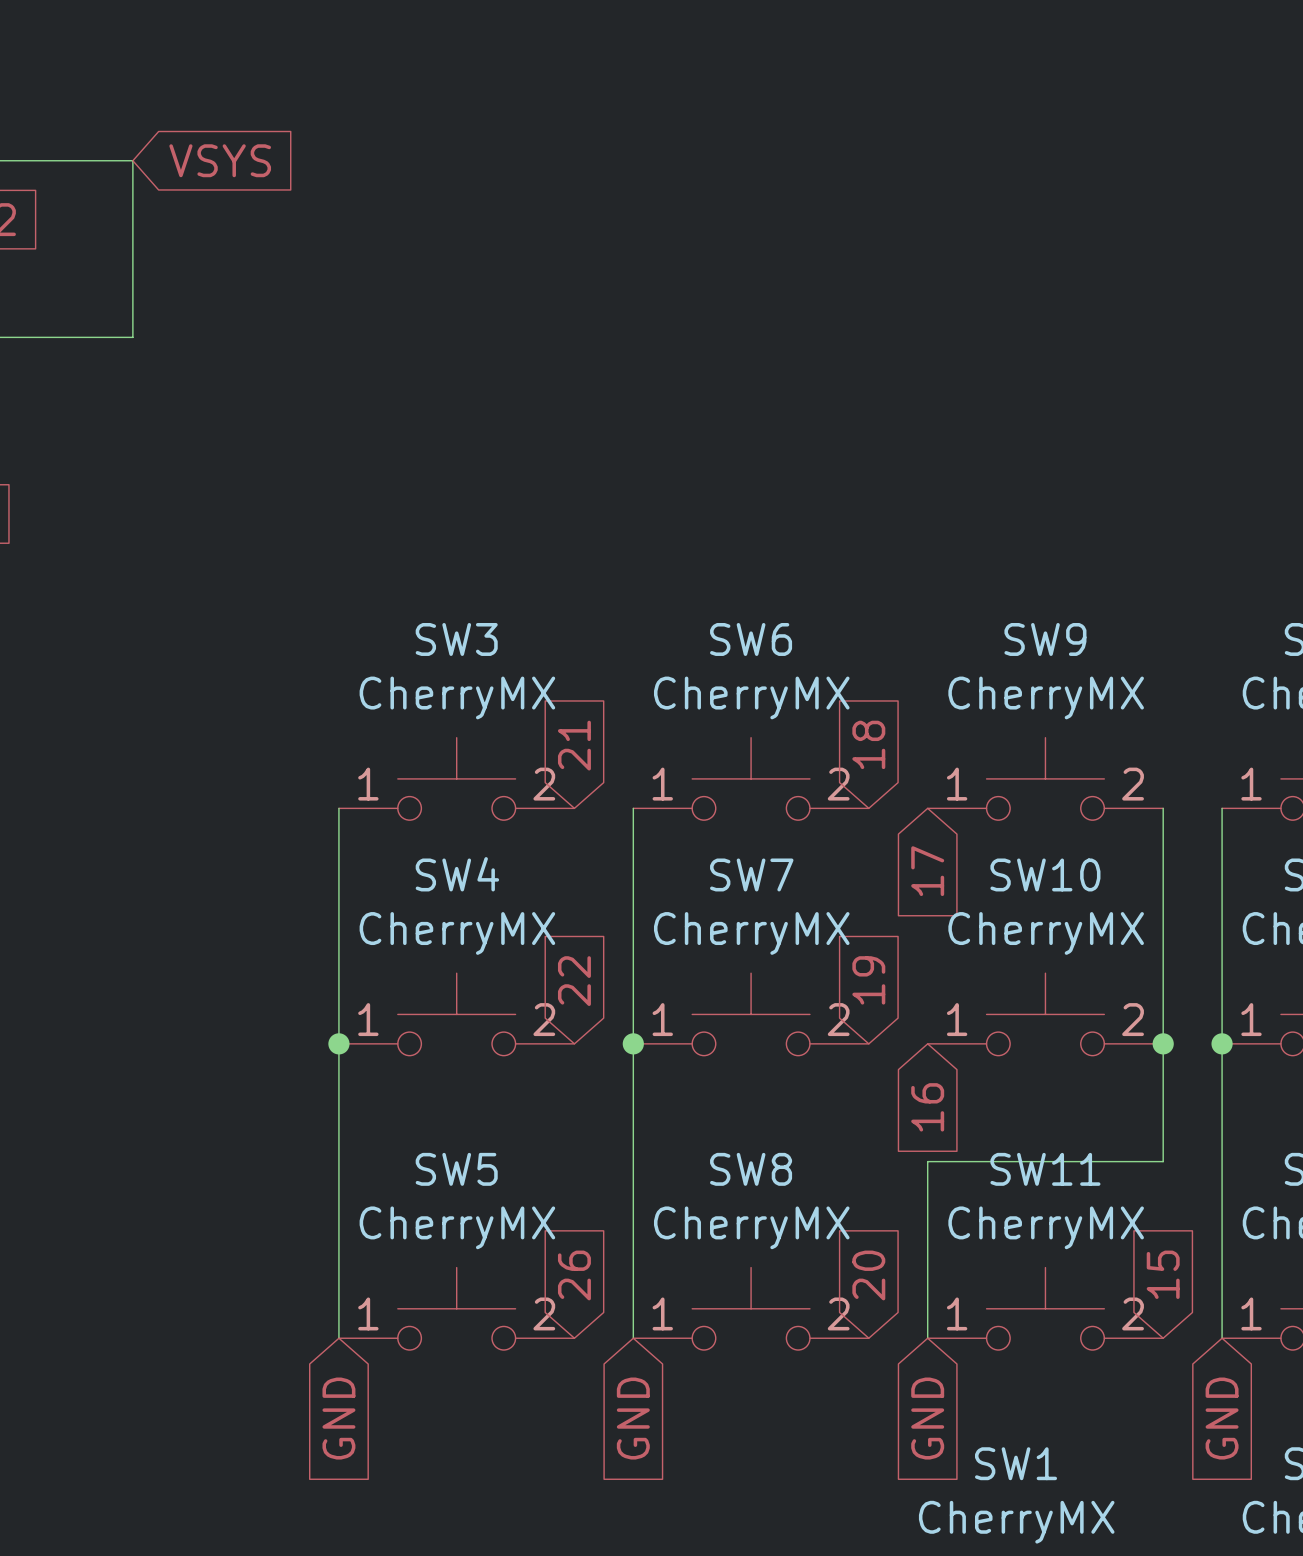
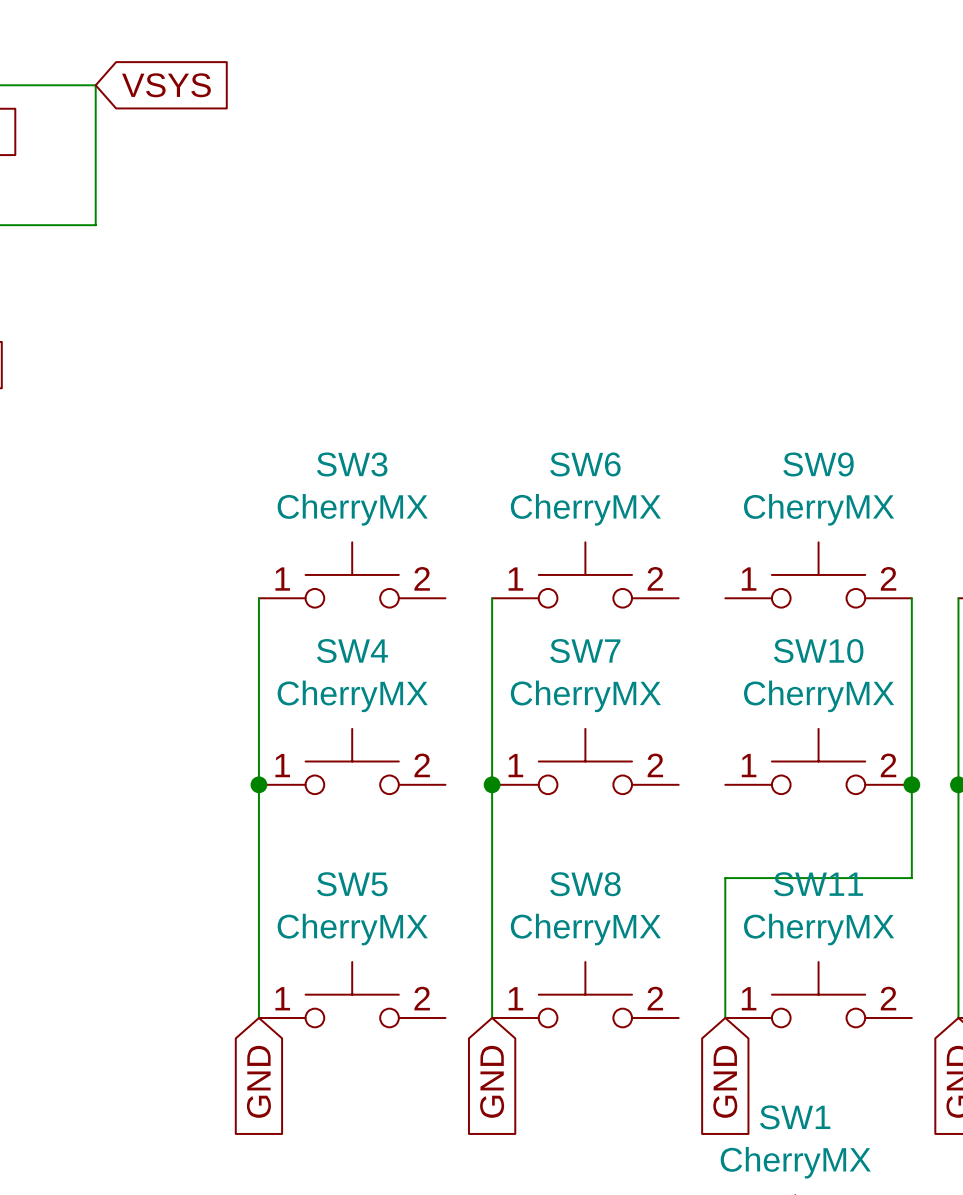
global label: 18 (868, 744) -> none
global label: 21 (574, 745) -> none
global label: 17 (927, 871) -> none
global label: 19 (868, 980) -> none
global label: 22 (574, 981) -> none
global label: 16 (927, 1107) -> none
global label: 15 (1163, 1274) -> none
global label: 26 (574, 1275) -> none
global label: 20 (868, 1275) -> none

